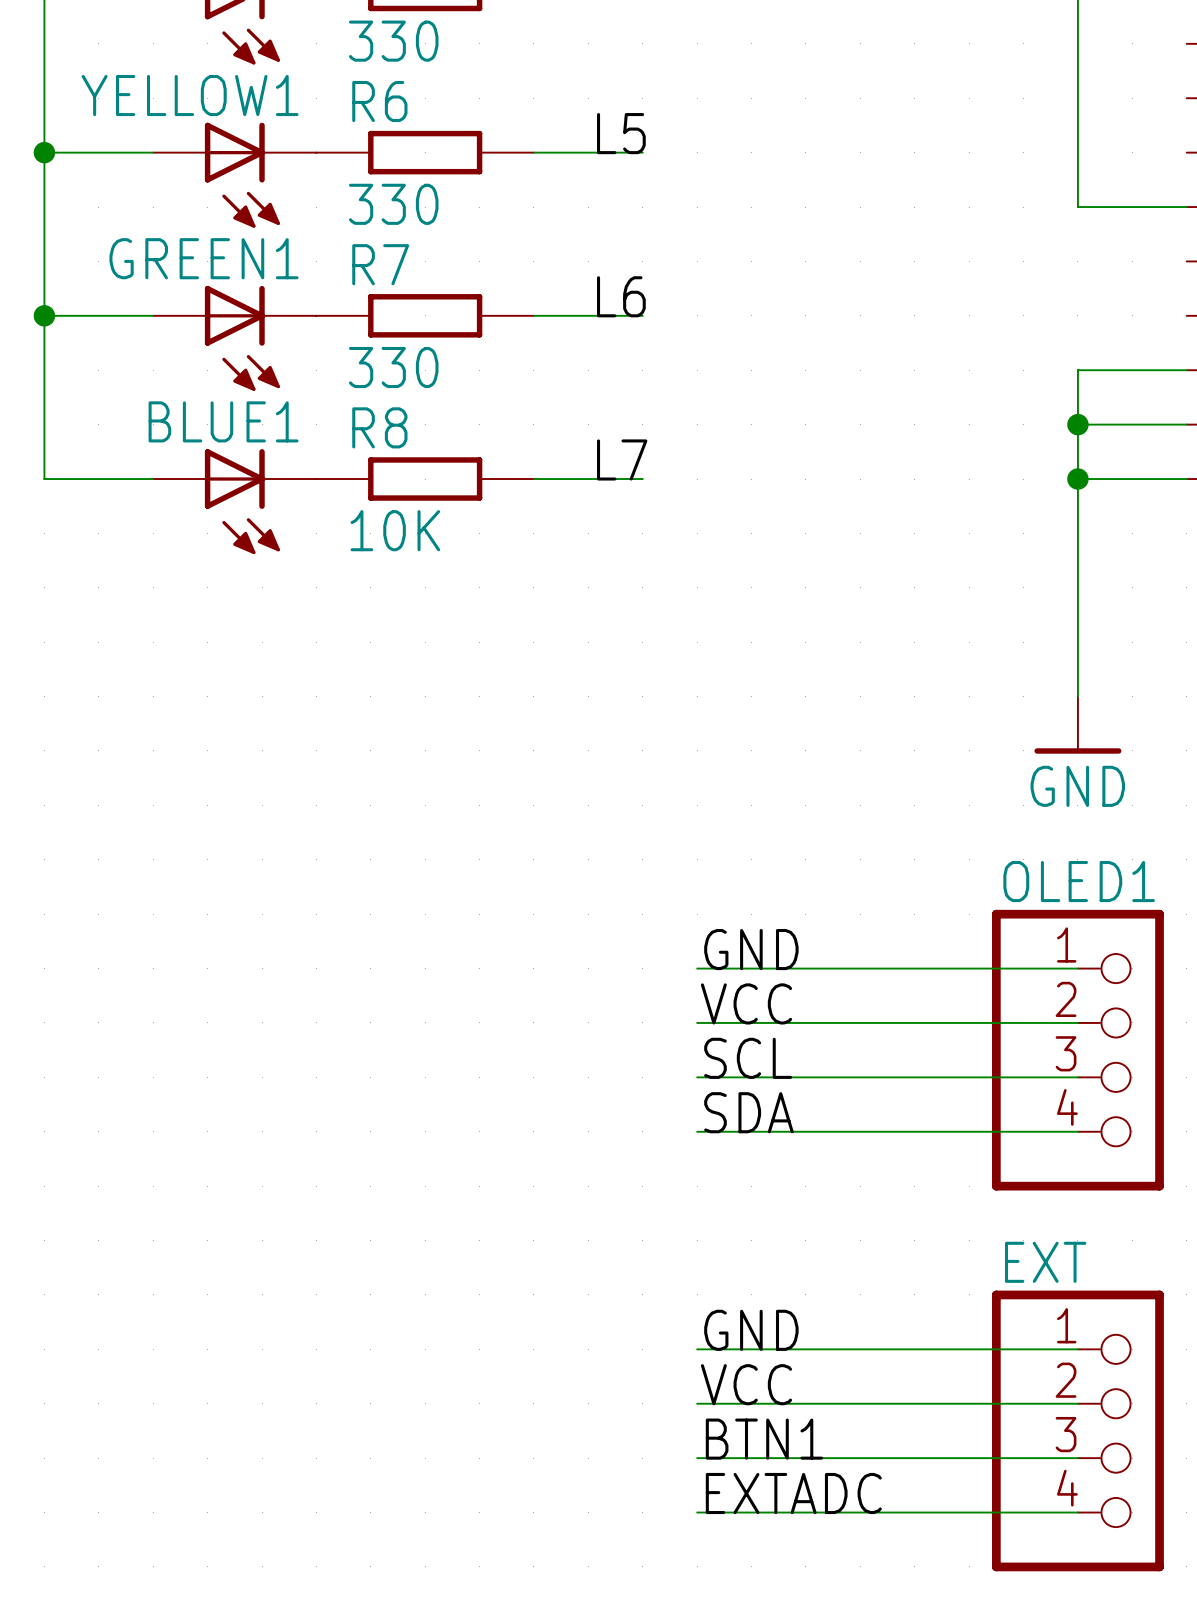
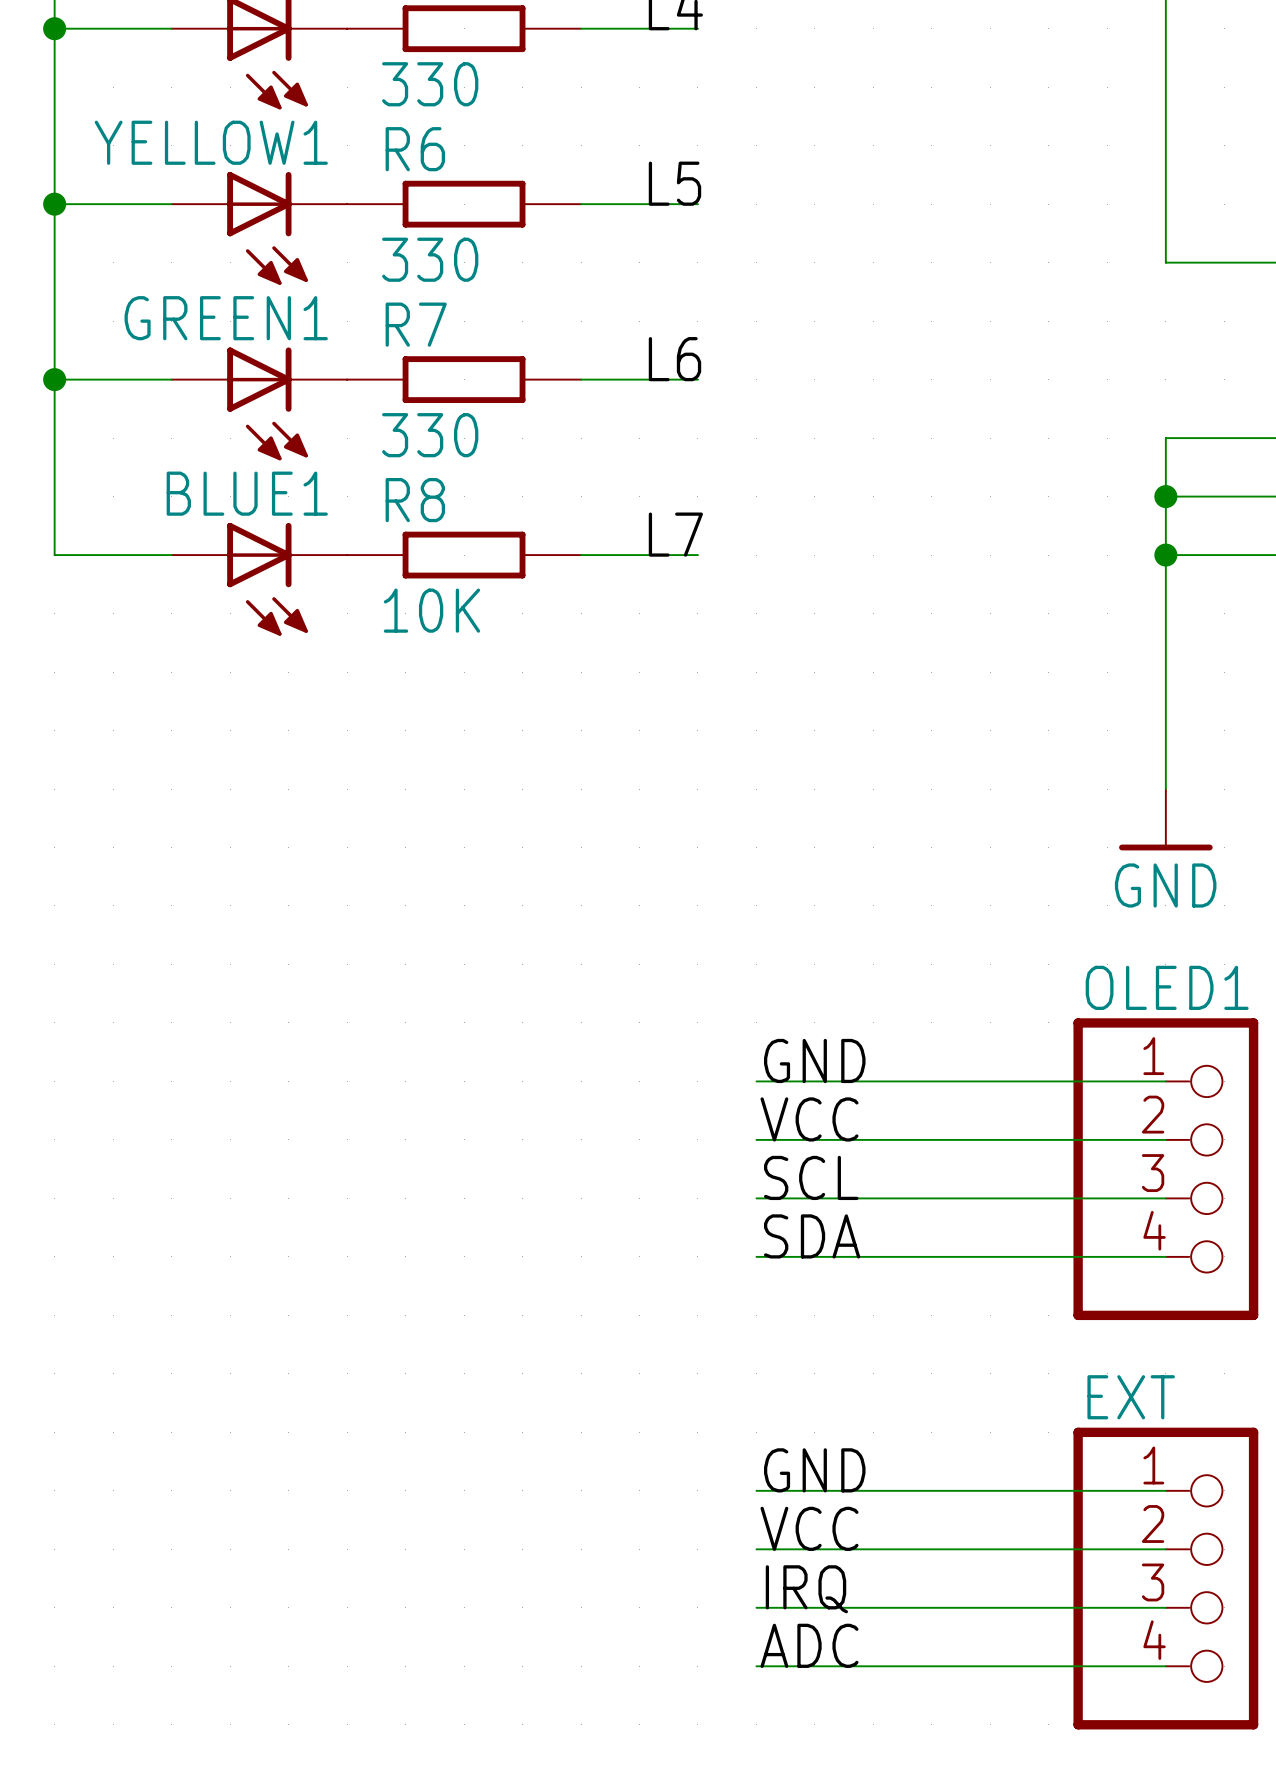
label: BTN1 (764, 1439) -> IRQ (806, 1589)
label: EXTADC (793, 1493) -> ADC (809, 1645)

